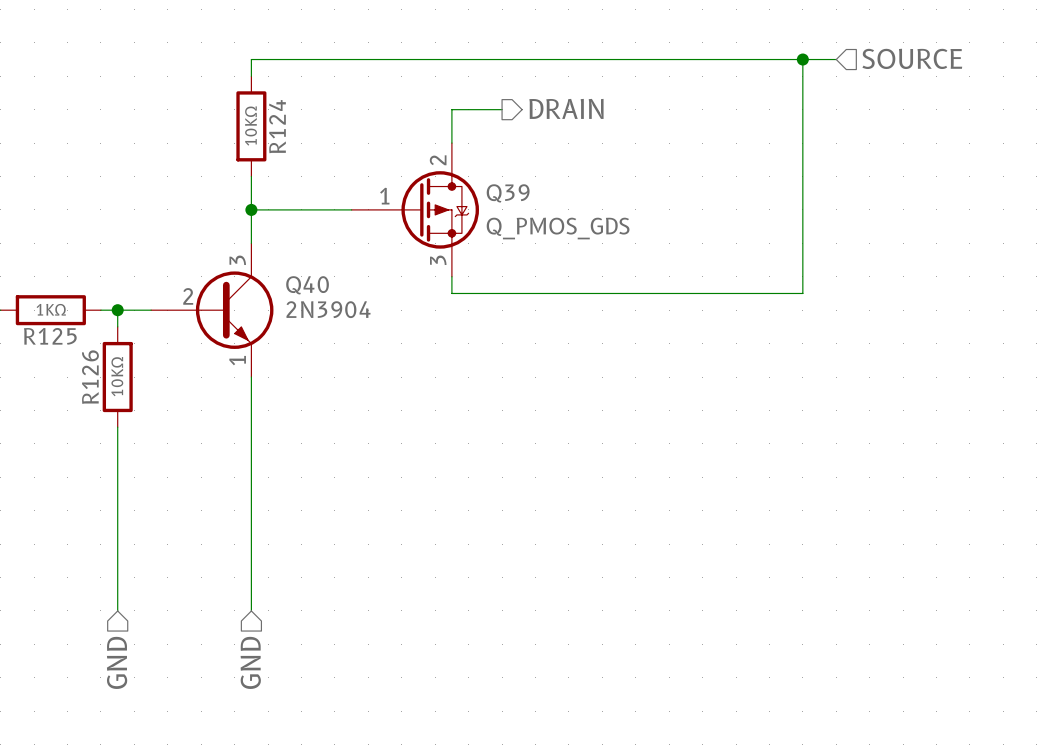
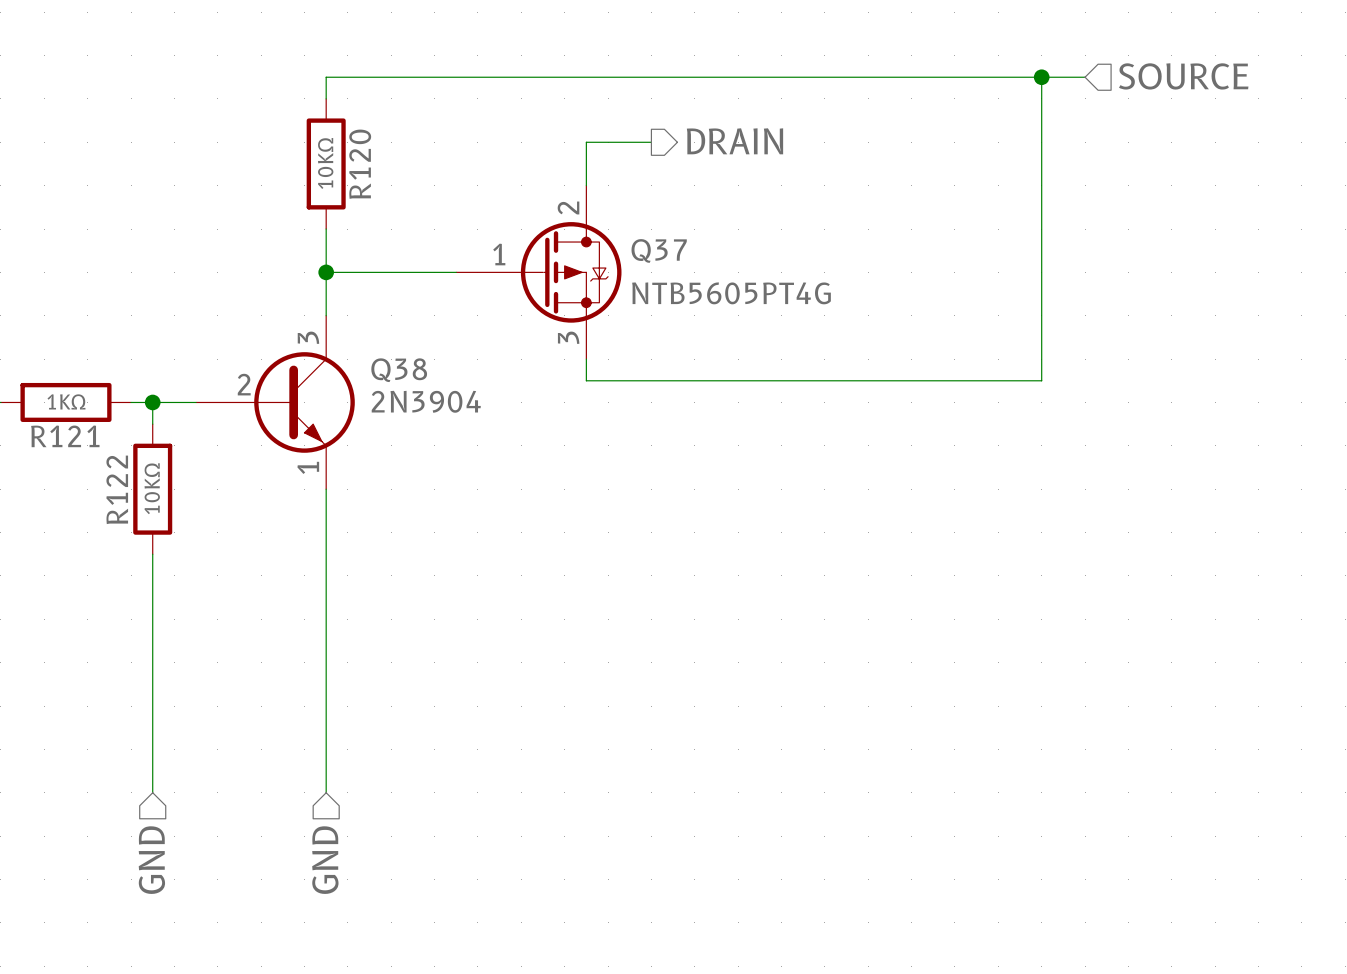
R124 name: R124 (277, 126) -> R120 (360, 164)
Q39 name: Q39 (508, 193) -> Q37 (659, 250)
Q39 value: Q_PMOS_GDS (558, 228) -> NTB5605PT4G (731, 293)
Q40 name: Q40 (307, 285) -> Q38 (399, 370)
R125 name: R125 (50, 336) -> R121 (65, 436)
R126 name: R126 (90, 377) -> R122 (117, 489)

